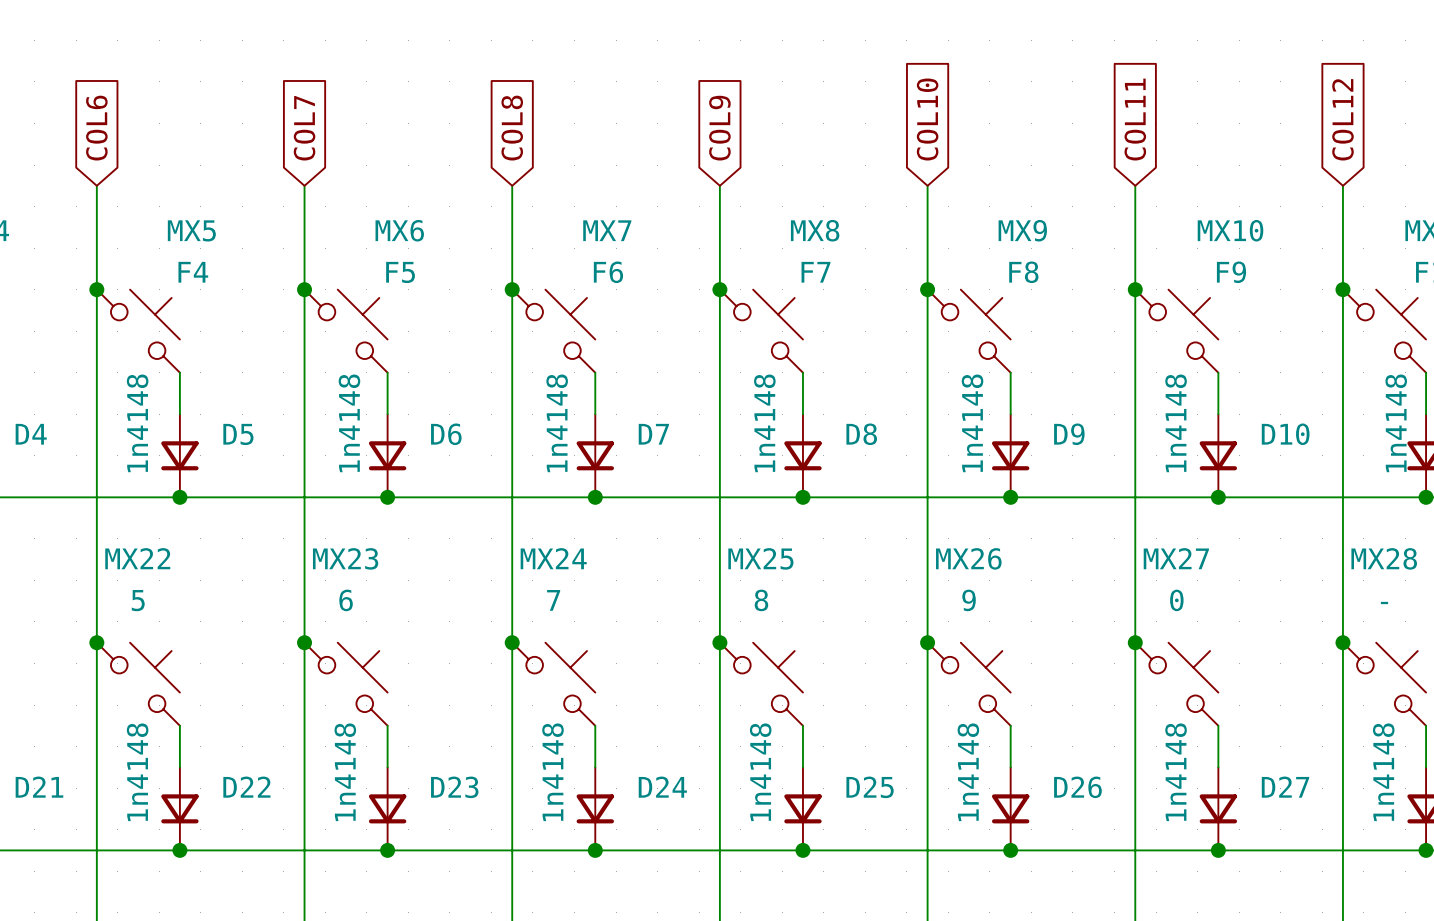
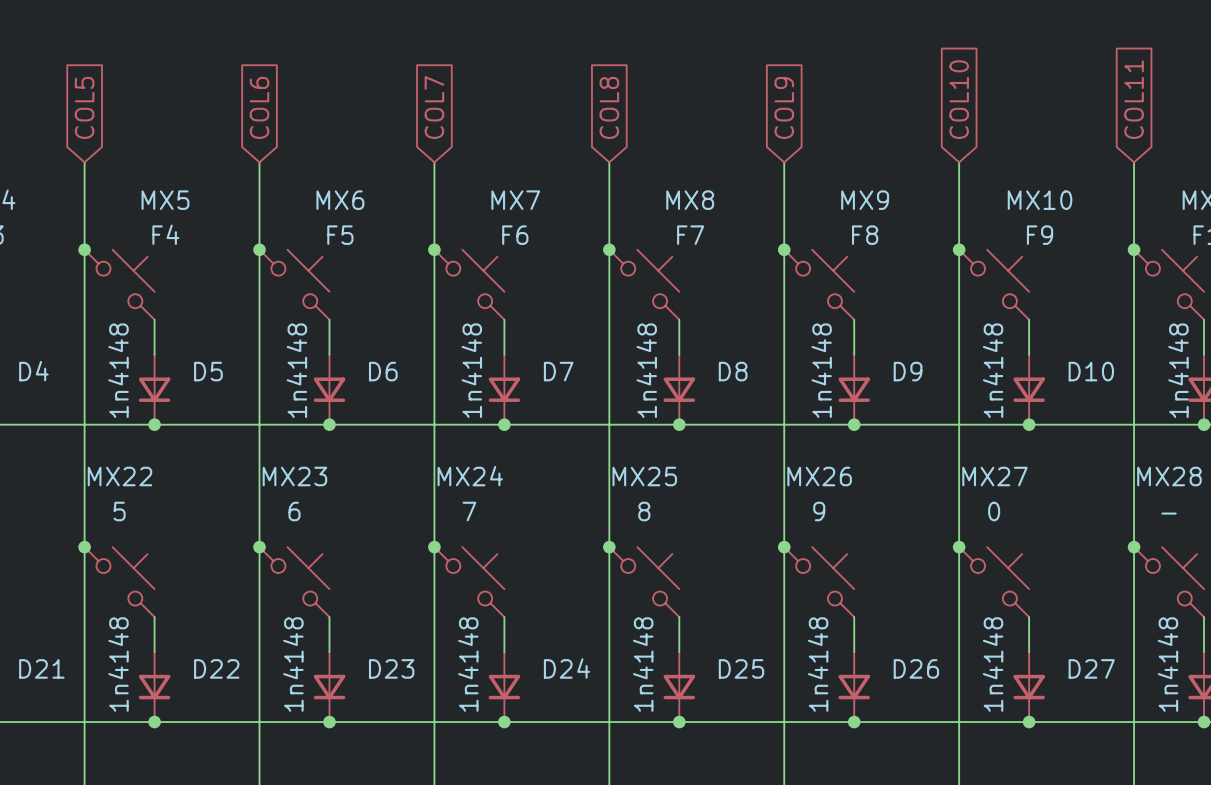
global label: COL10 (927, 119) -> COL9 (784, 107)
global label: COL11 (1135, 119) -> COL10 (959, 99)
global label: COL12 (1342, 119) -> COL11 (1134, 99)
global label: COL6 (96, 128) -> COL5 (84, 107)
global label: COL7 (304, 128) -> COL6 (259, 107)
global label: COL8 (512, 128) -> COL7 (434, 107)
global label: COL9 (719, 128) -> COL8 (609, 107)

